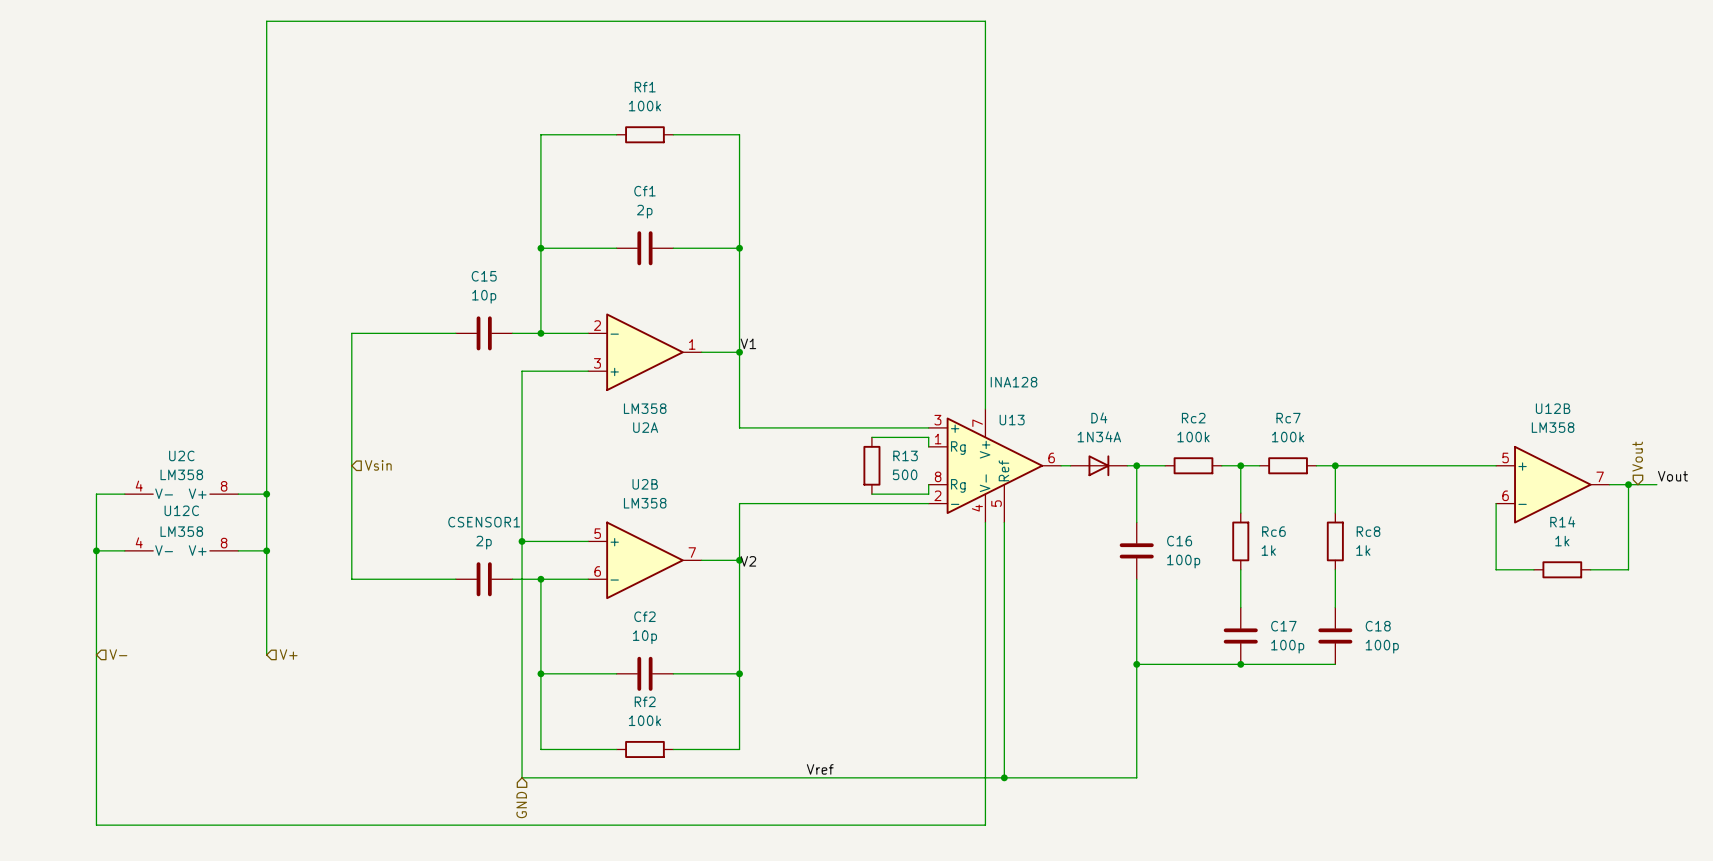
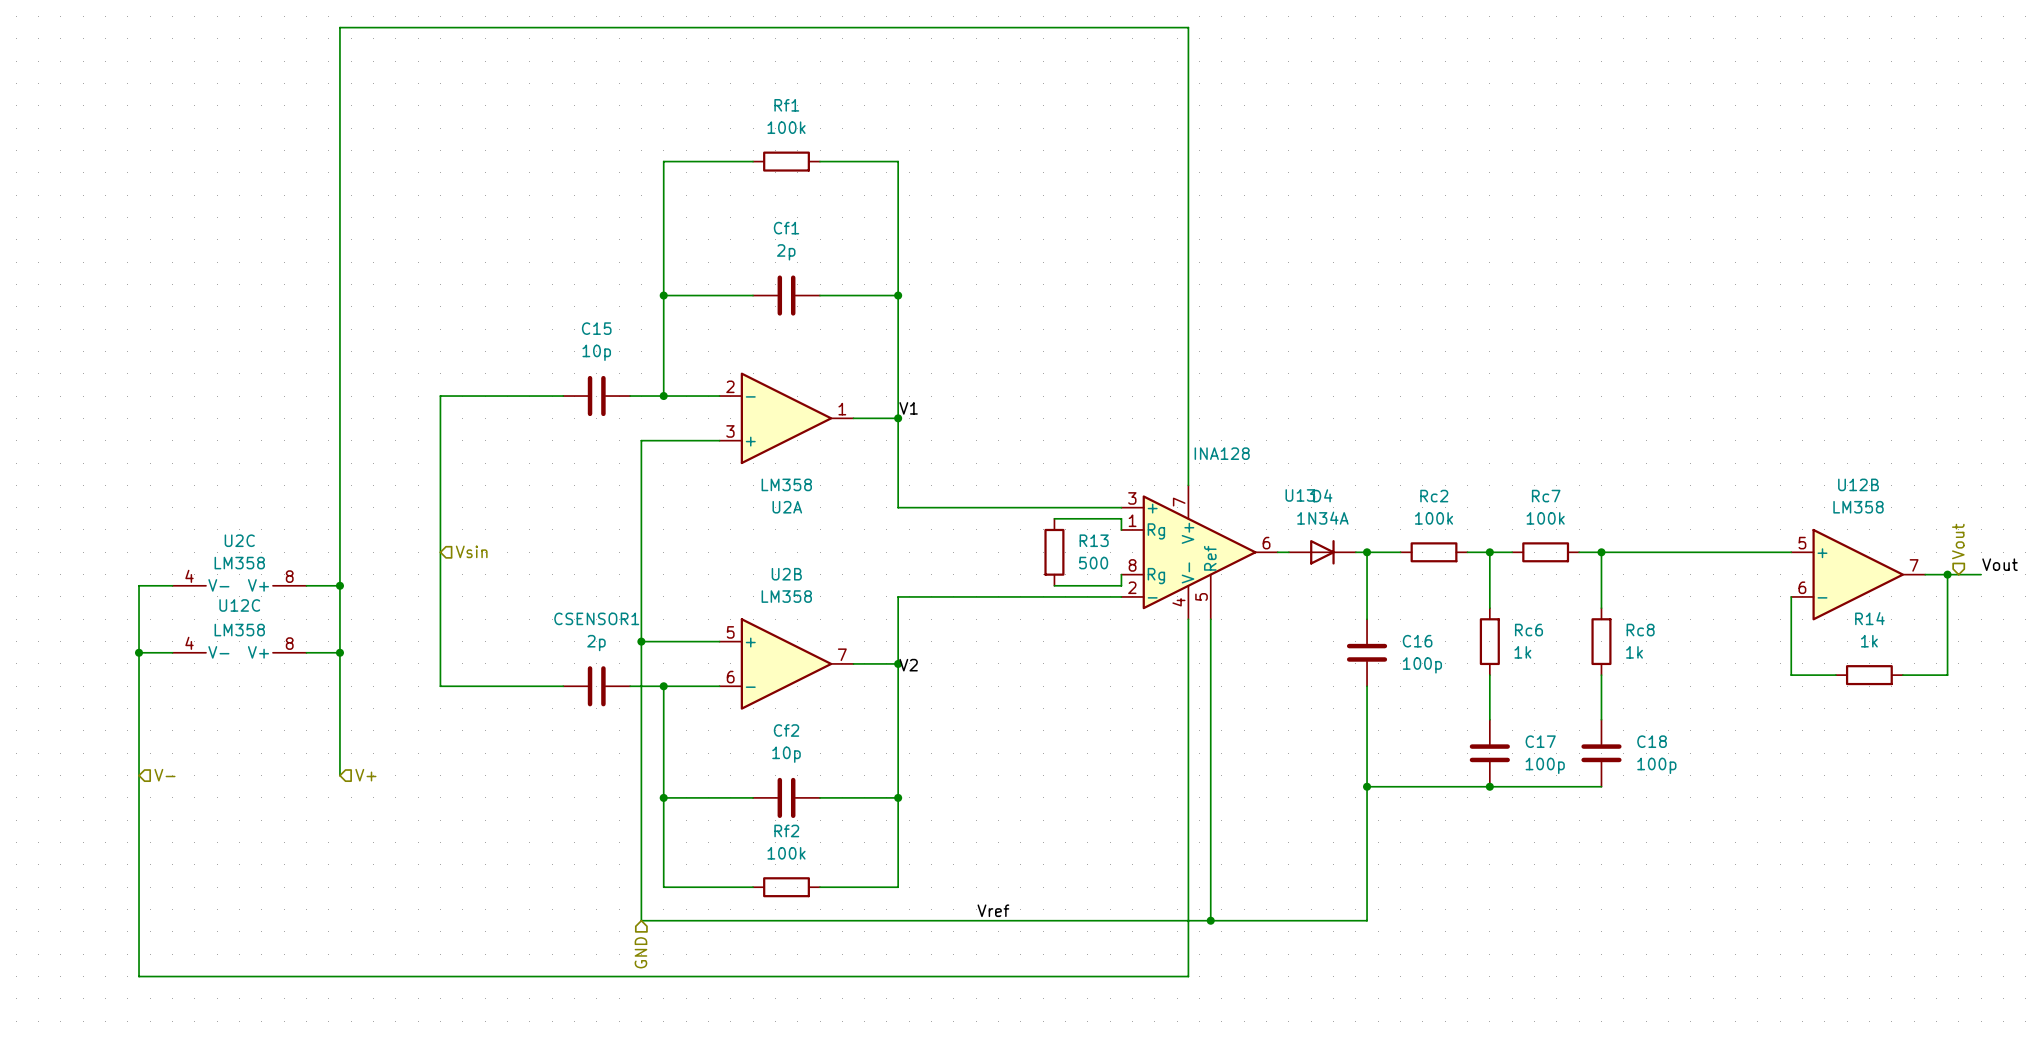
U13 name position: U13 (1012, 420) -> U13 (1300, 495)

